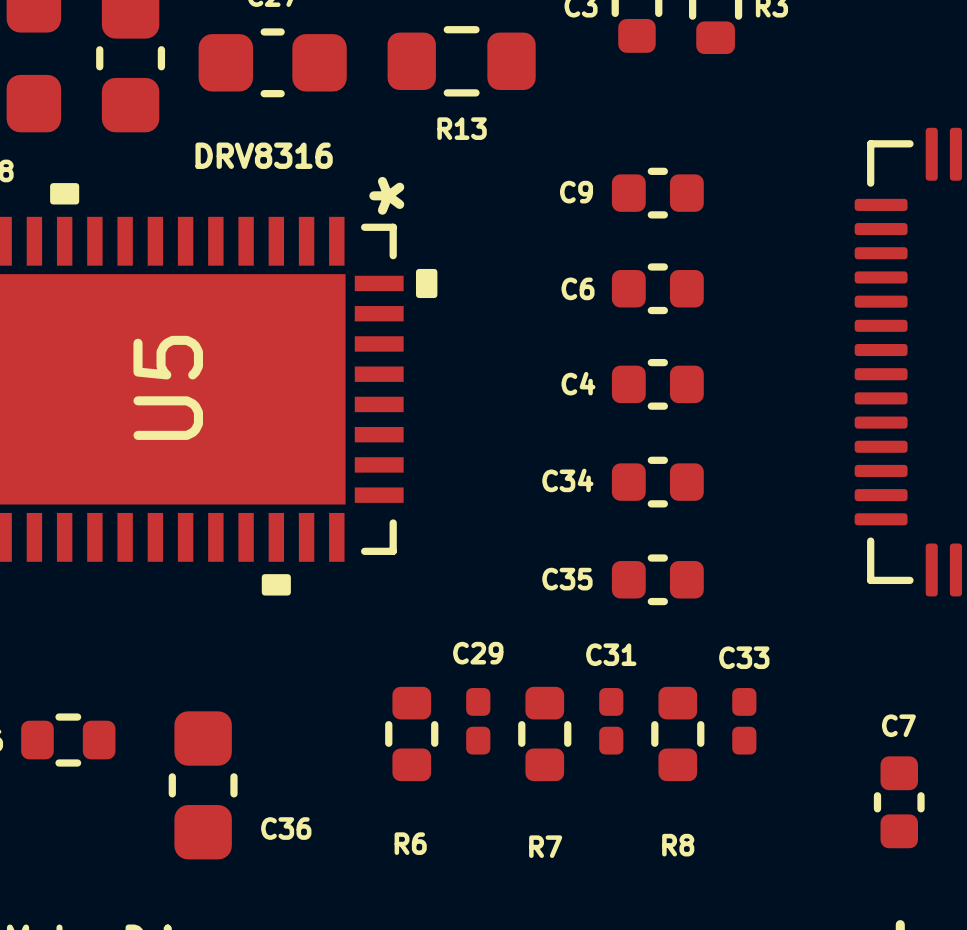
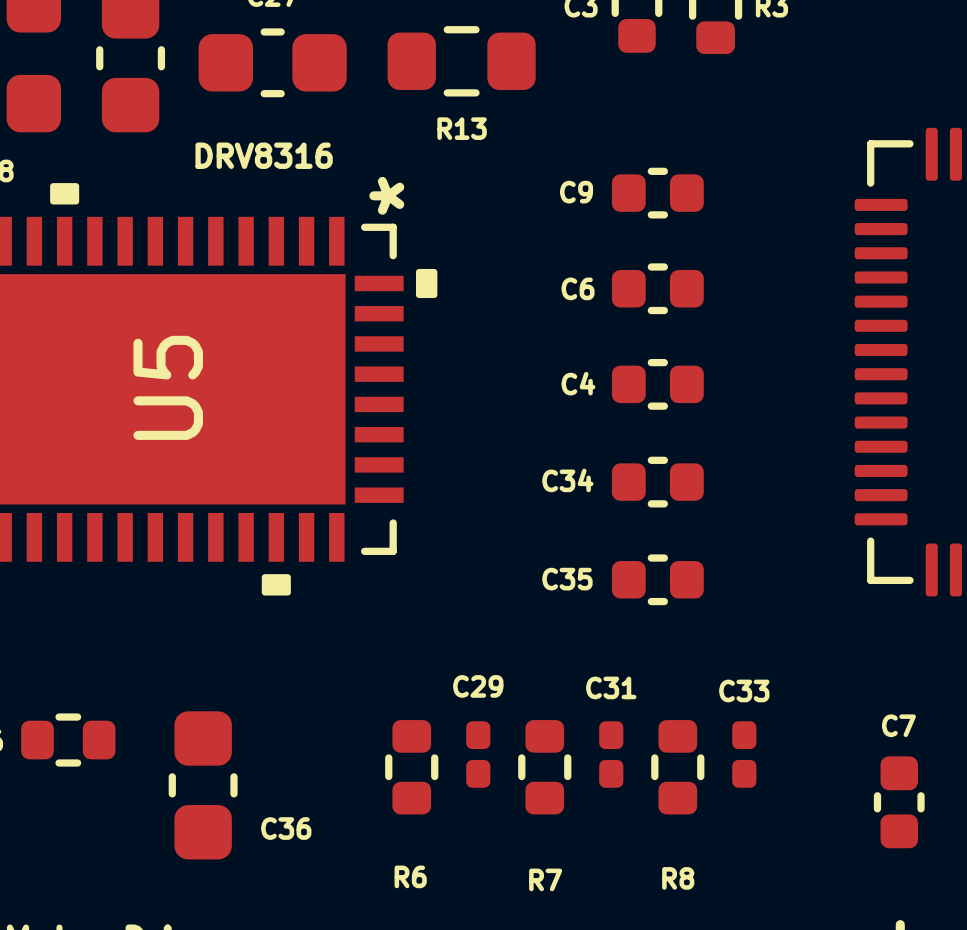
C29 position: (478, 721) -> (478, 754)
C31 position: (611, 721) -> (611, 754)
C33 position: (744, 721) -> (744, 754)
R6 position: (411, 733) -> (411, 767)
R7 position: (544, 733) -> (544, 767)
R8 position: (677, 733) -> (677, 767)

